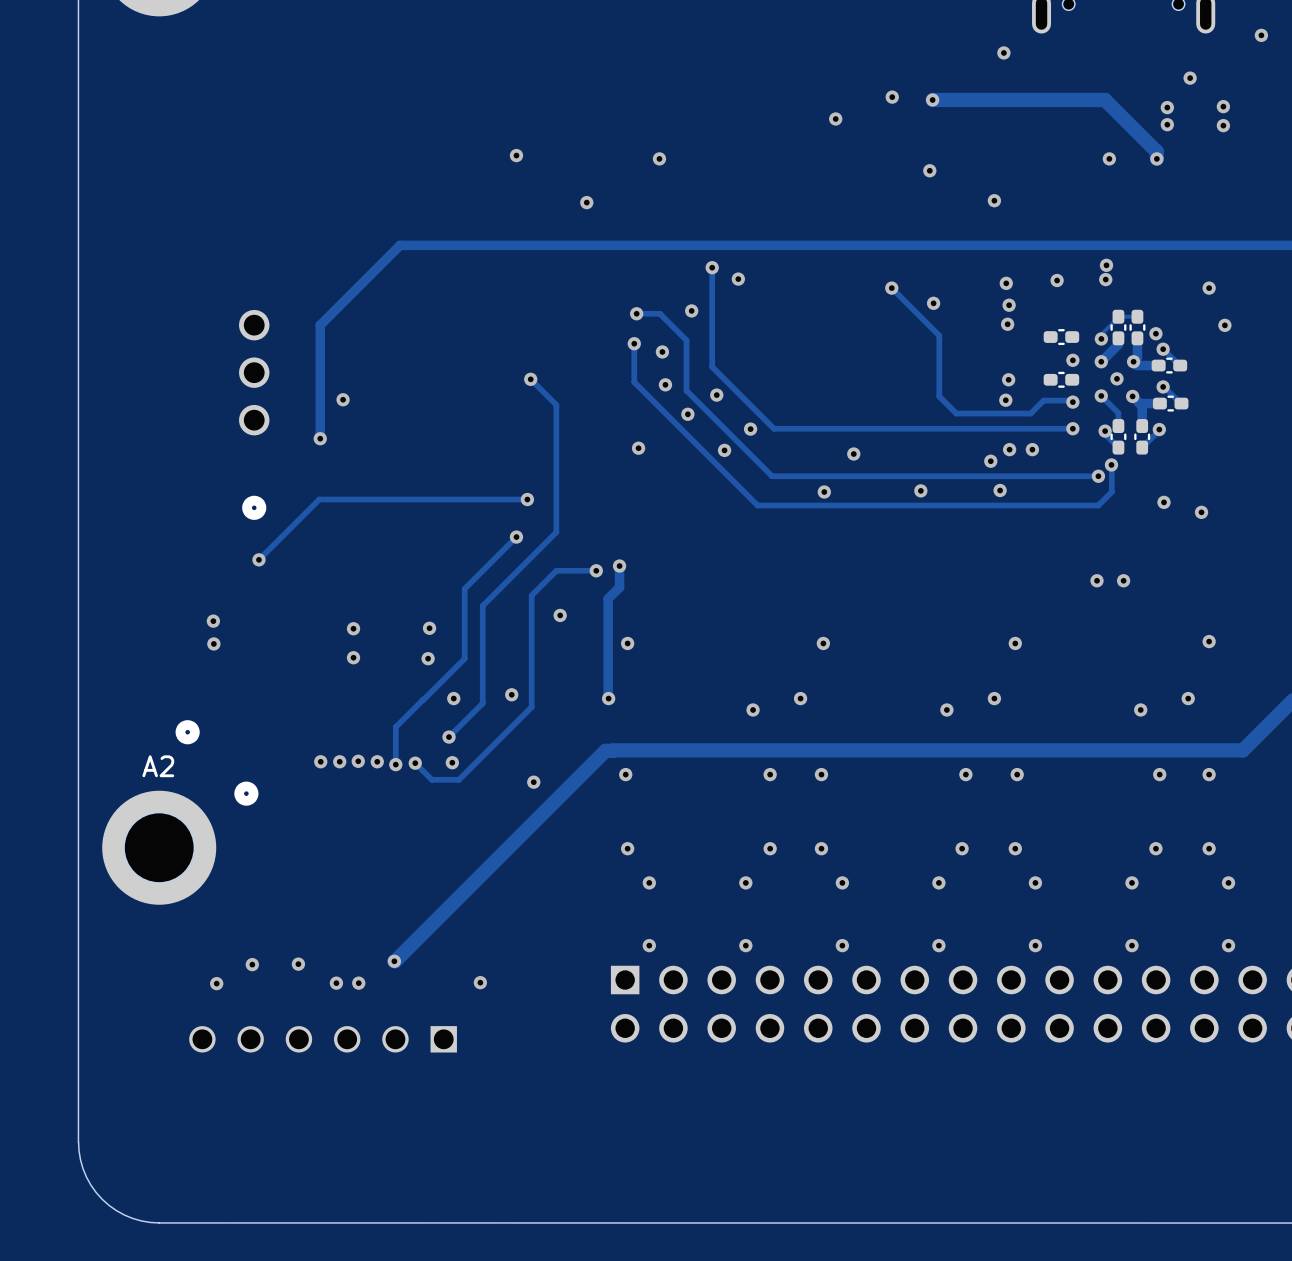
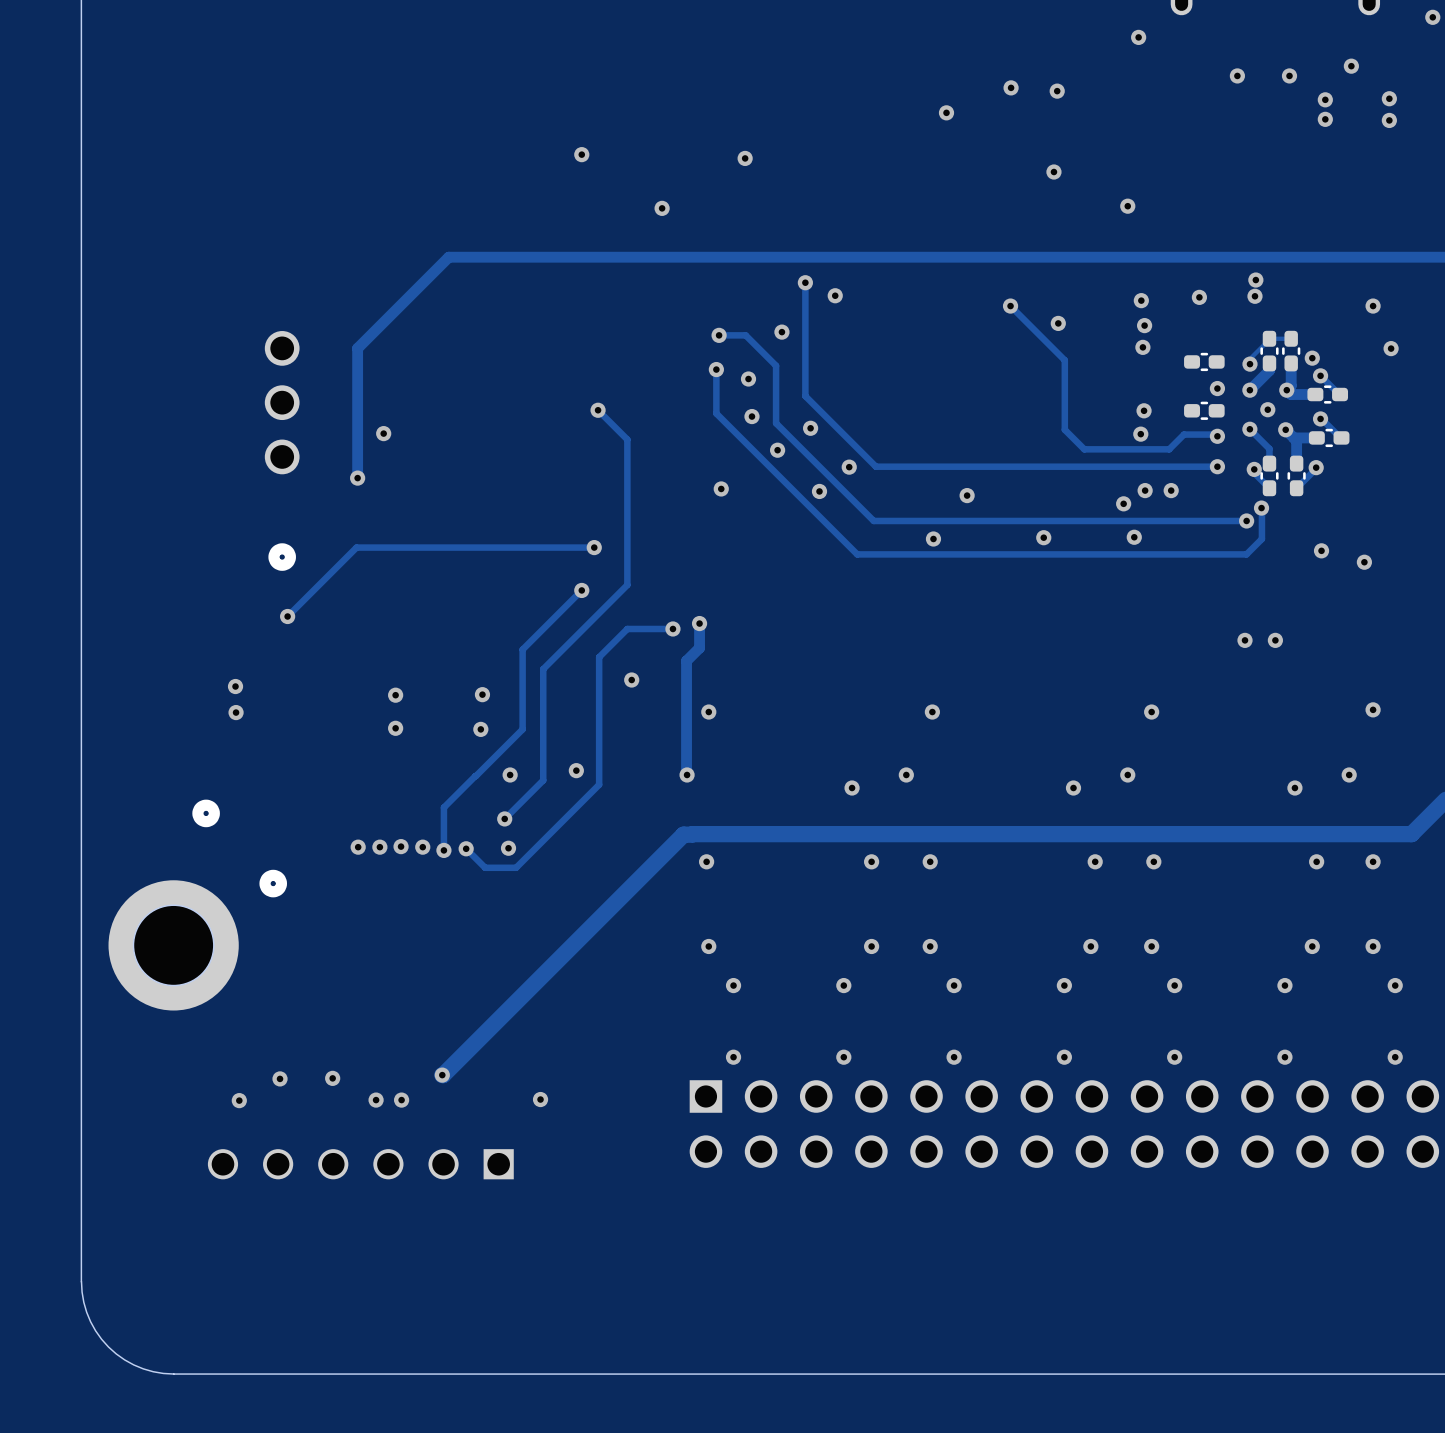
via: none -> (1237, 75)
via: none -> (1289, 75)
track: (932, 99) (1104, 99) (1156, 151) (1156, 158) -> none
via: (1109, 158) -> none
via: (1156, 158) -> none
A2 name: A2 (158, 766) -> none
via: (533, 782) -> none

